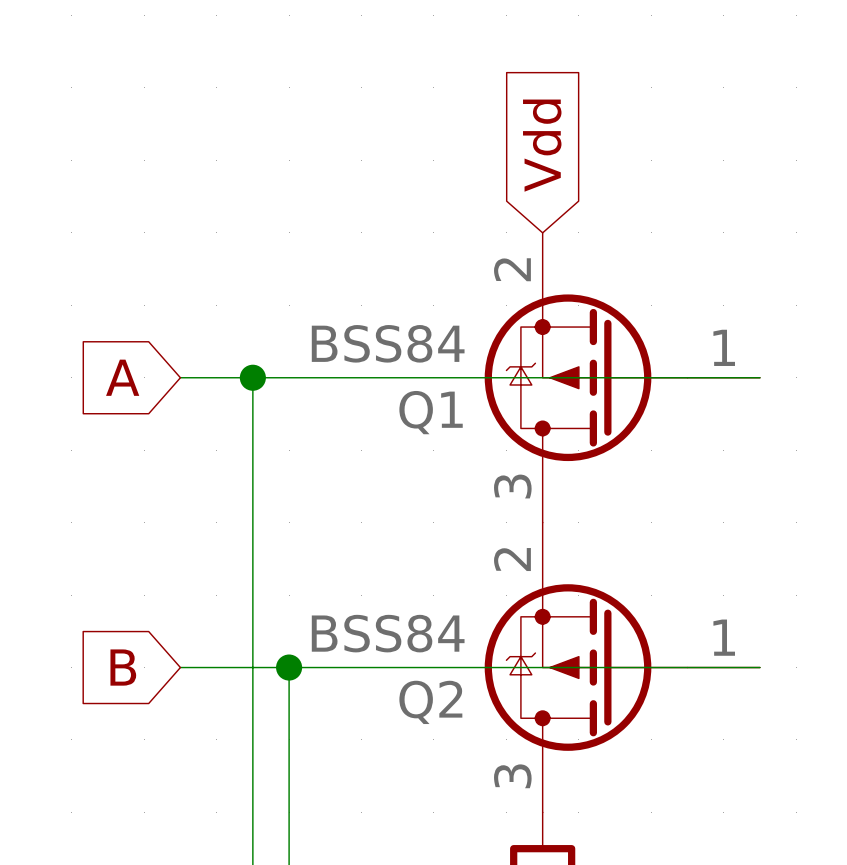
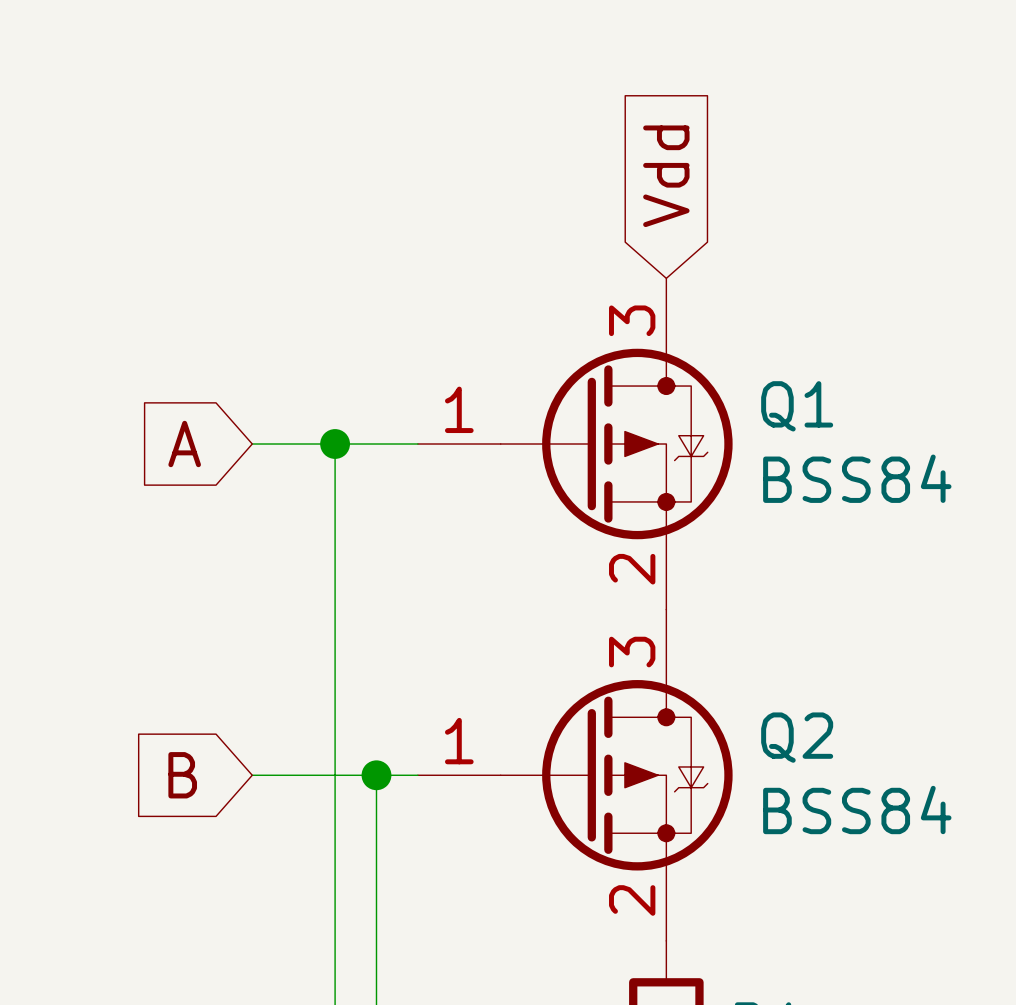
Q1 rotation: 0° (586, 377) -> 180° (616, 444)
Q2 rotation: 0° (586, 667) -> 180° (616, 775)

